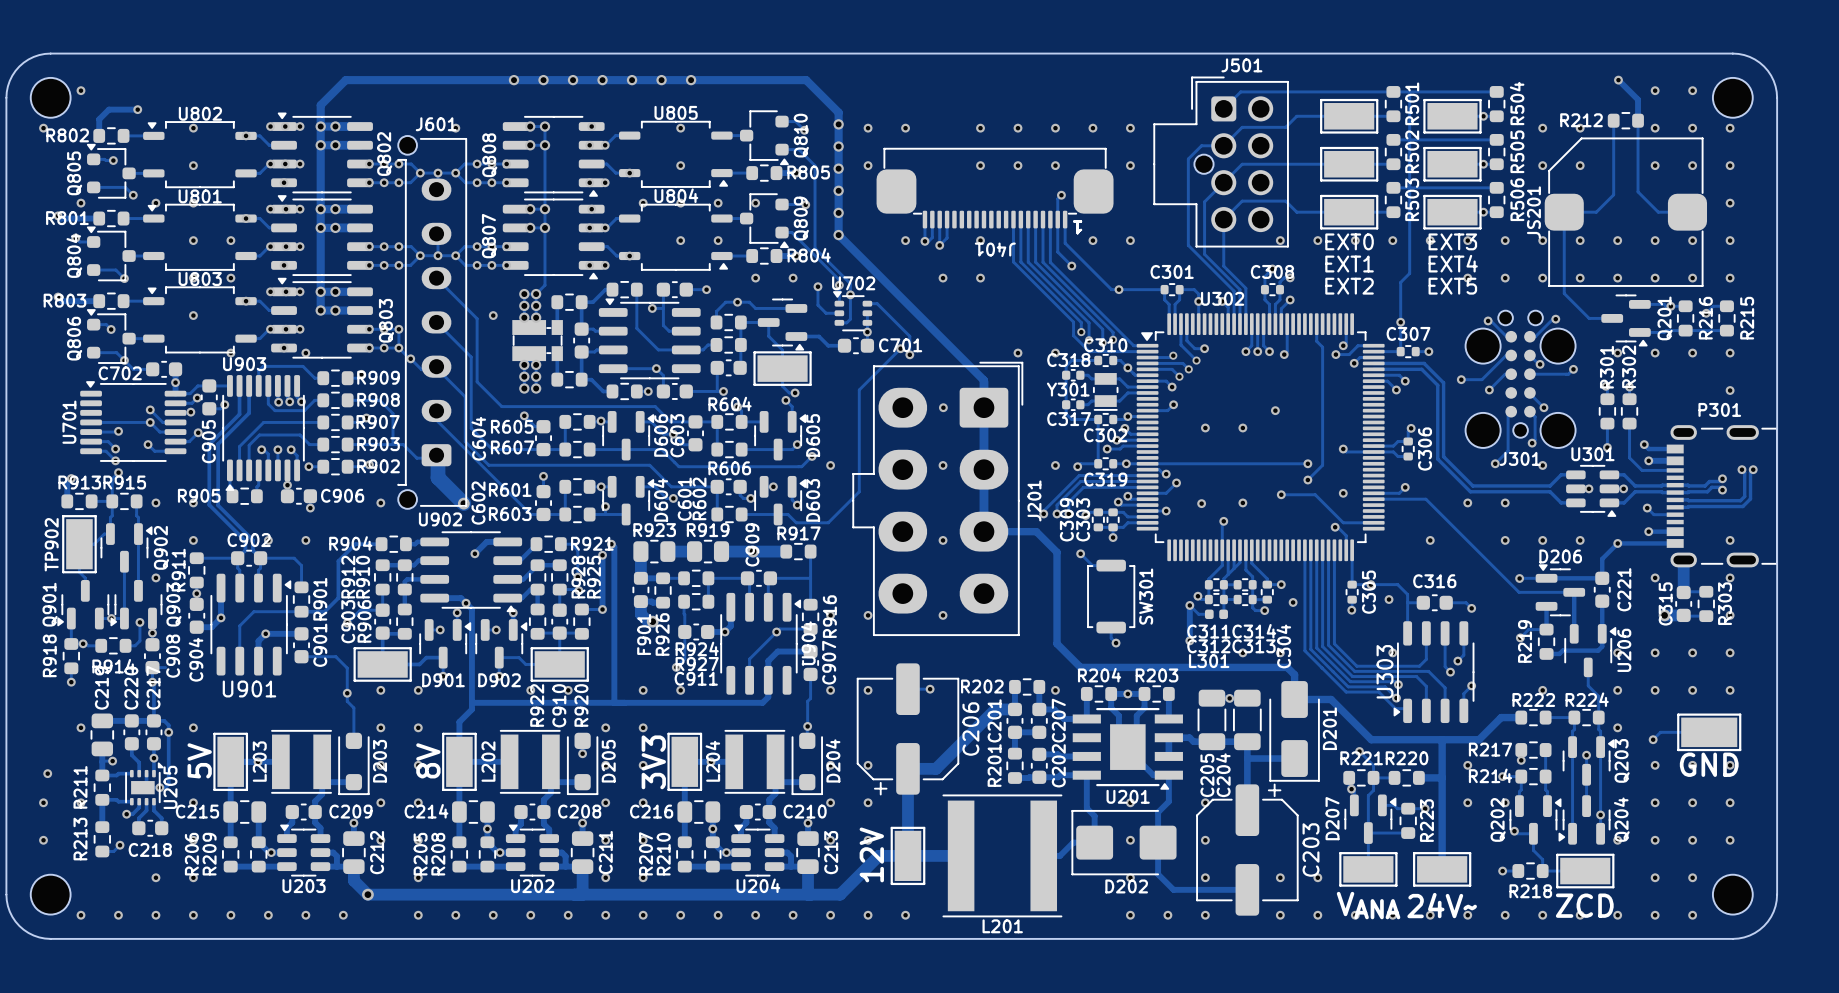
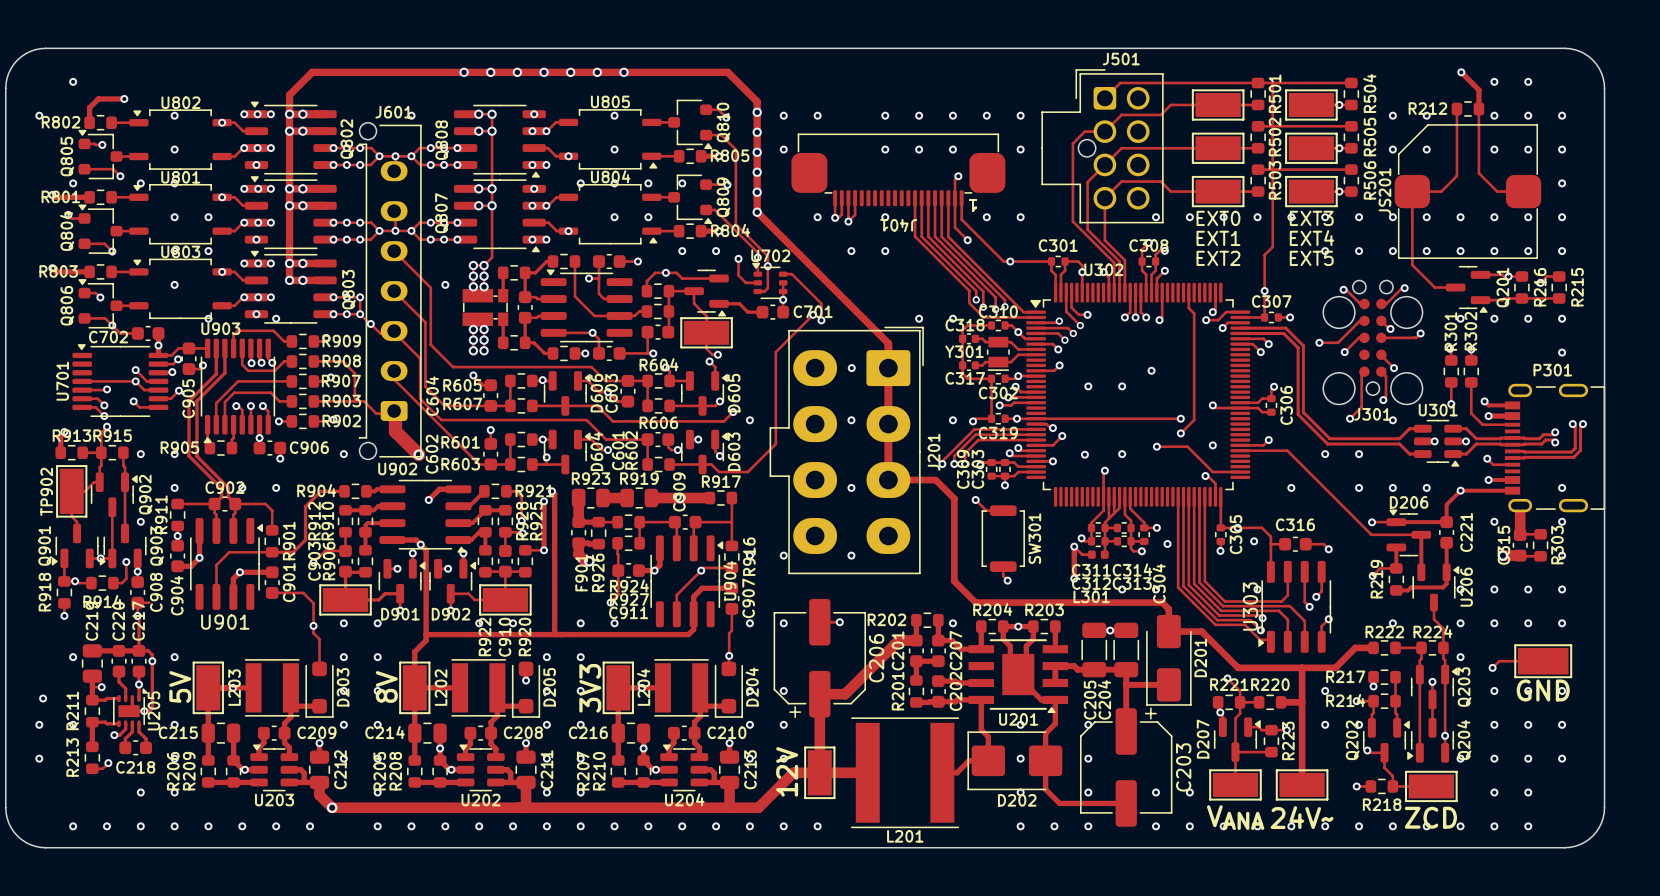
part: (50, 97) -> none
part: (1732, 97) -> none
part: (50, 894) -> none
part: (1732, 894) -> none

